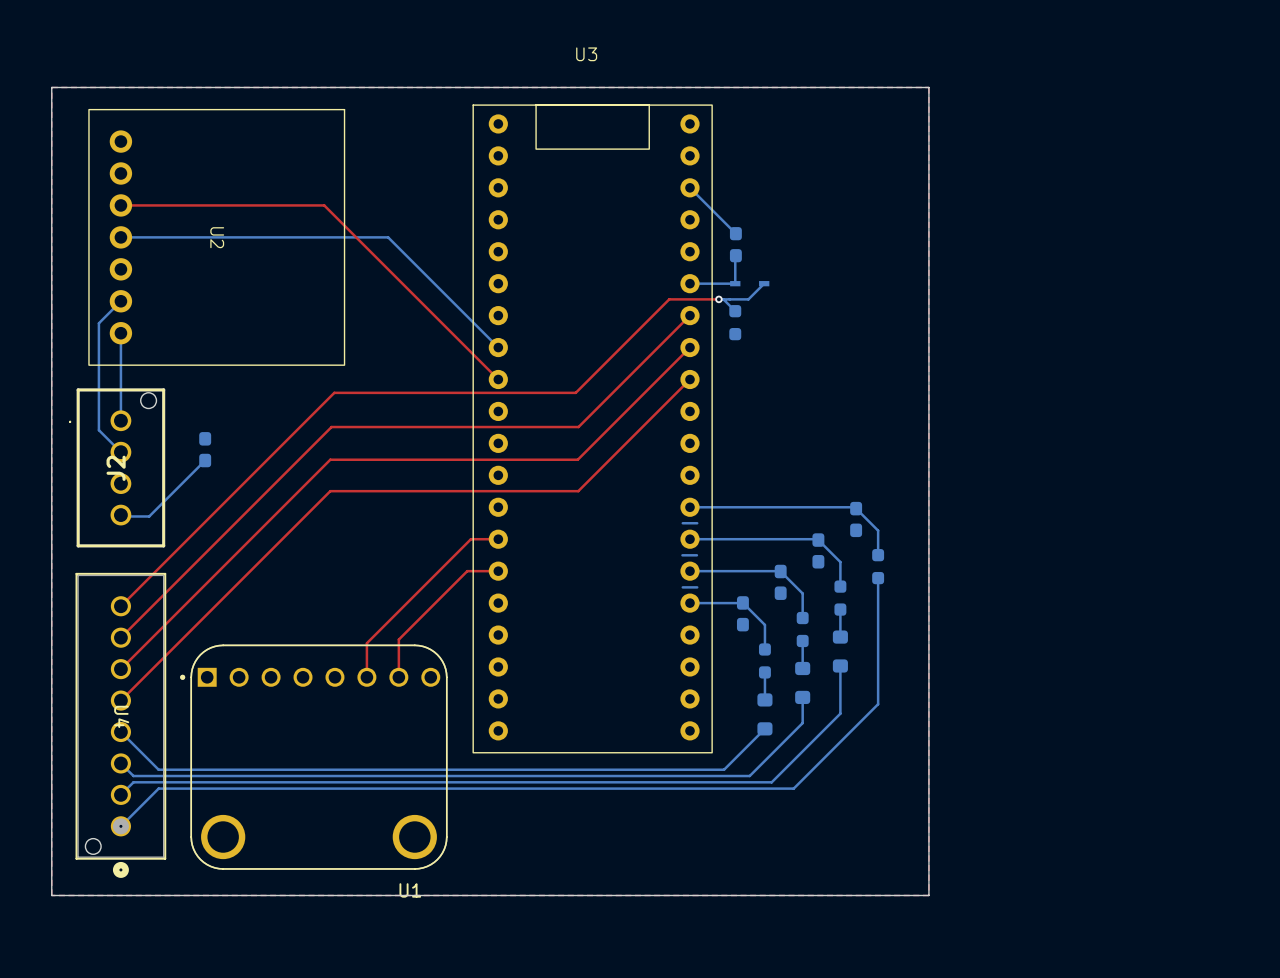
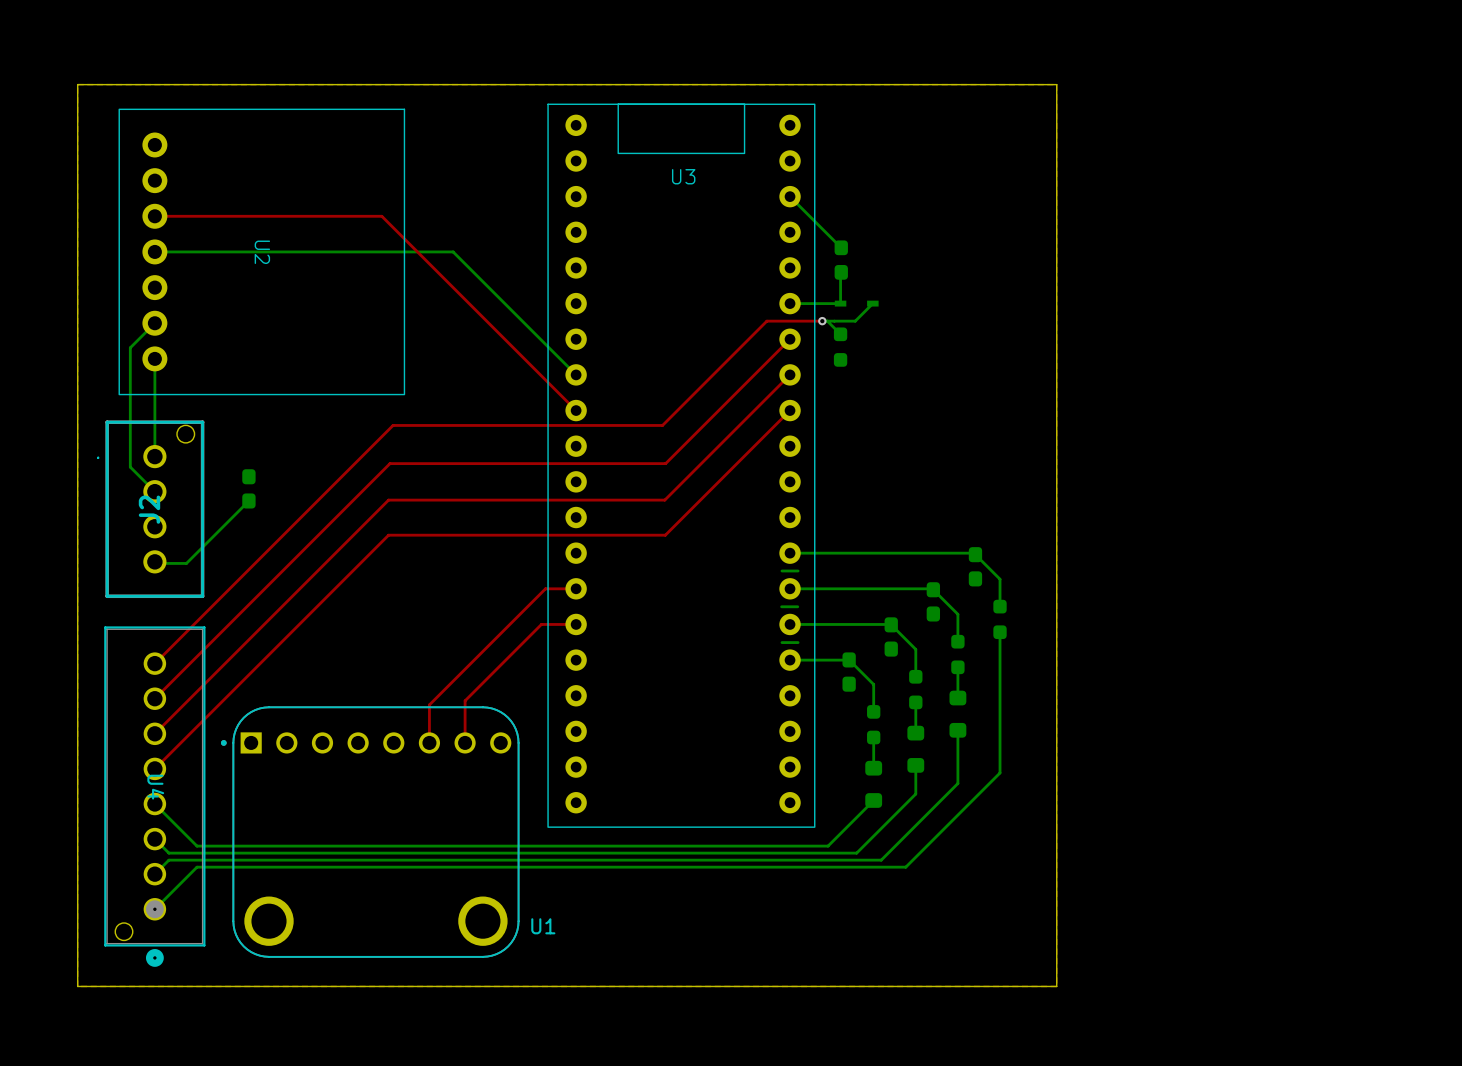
U3 name position: U3 (586, 54) -> U3 (683, 176)
U1 name position: U1 (410, 890) -> U1 (543, 926)

